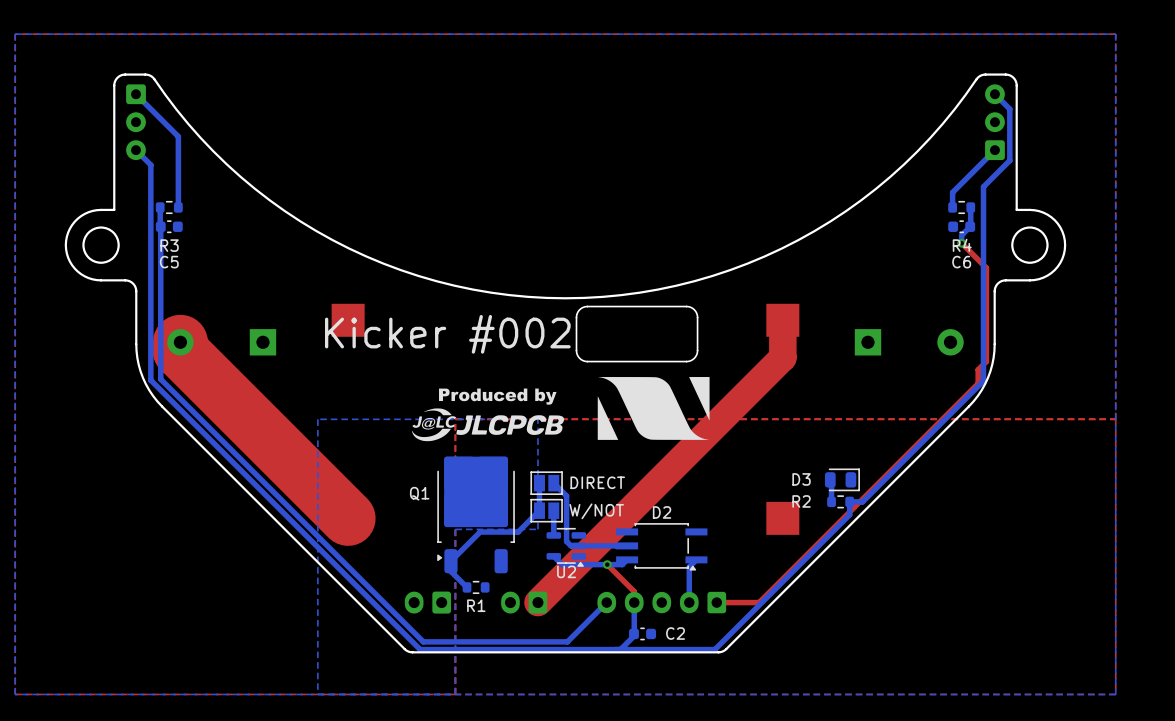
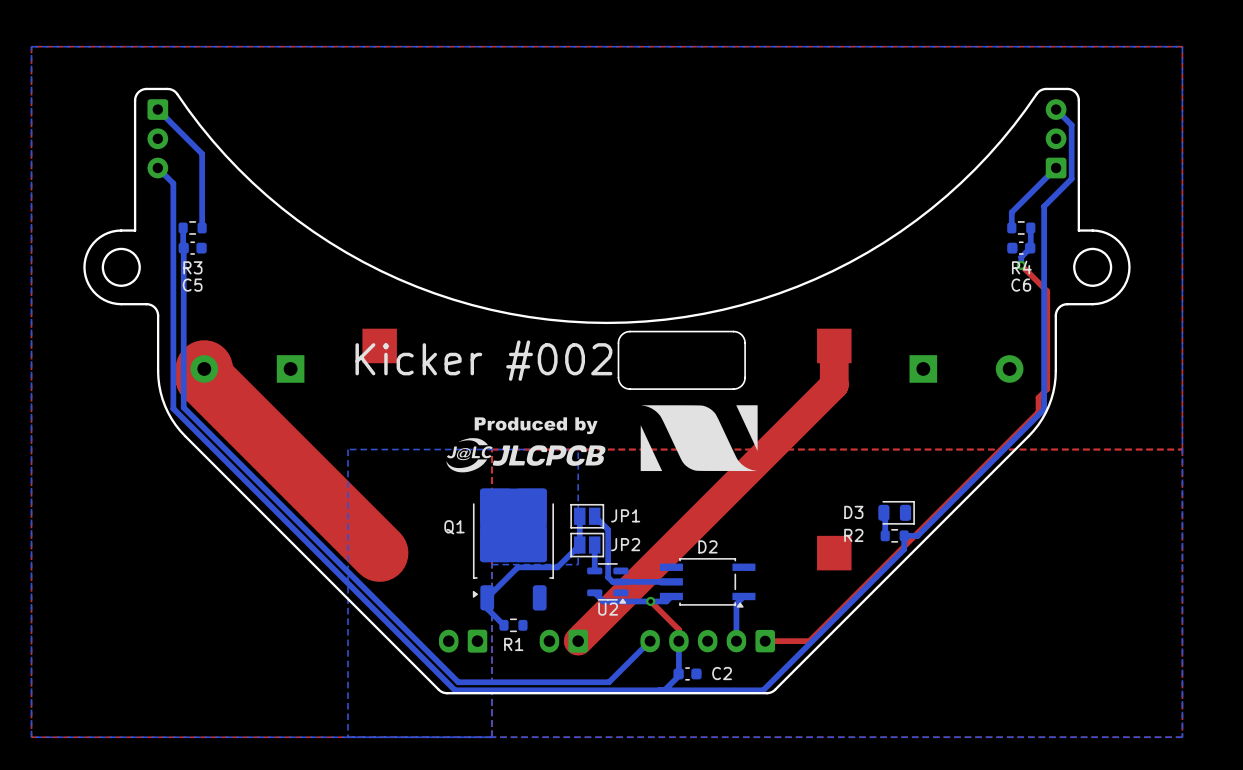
DIRECT name: DIRECT (597, 482) -> JP1 (625, 515)
W/NOT name: W/NOT (596, 511) -> JP2 (625, 544)

